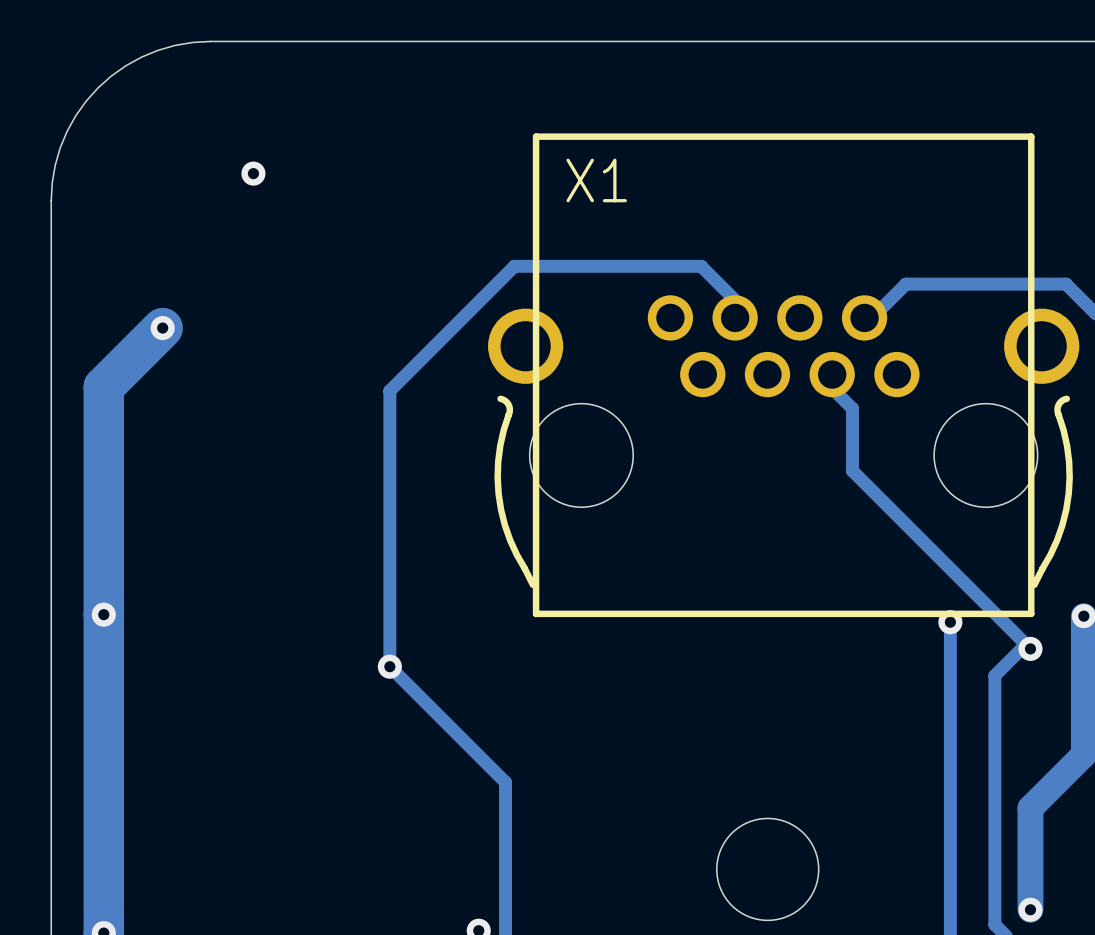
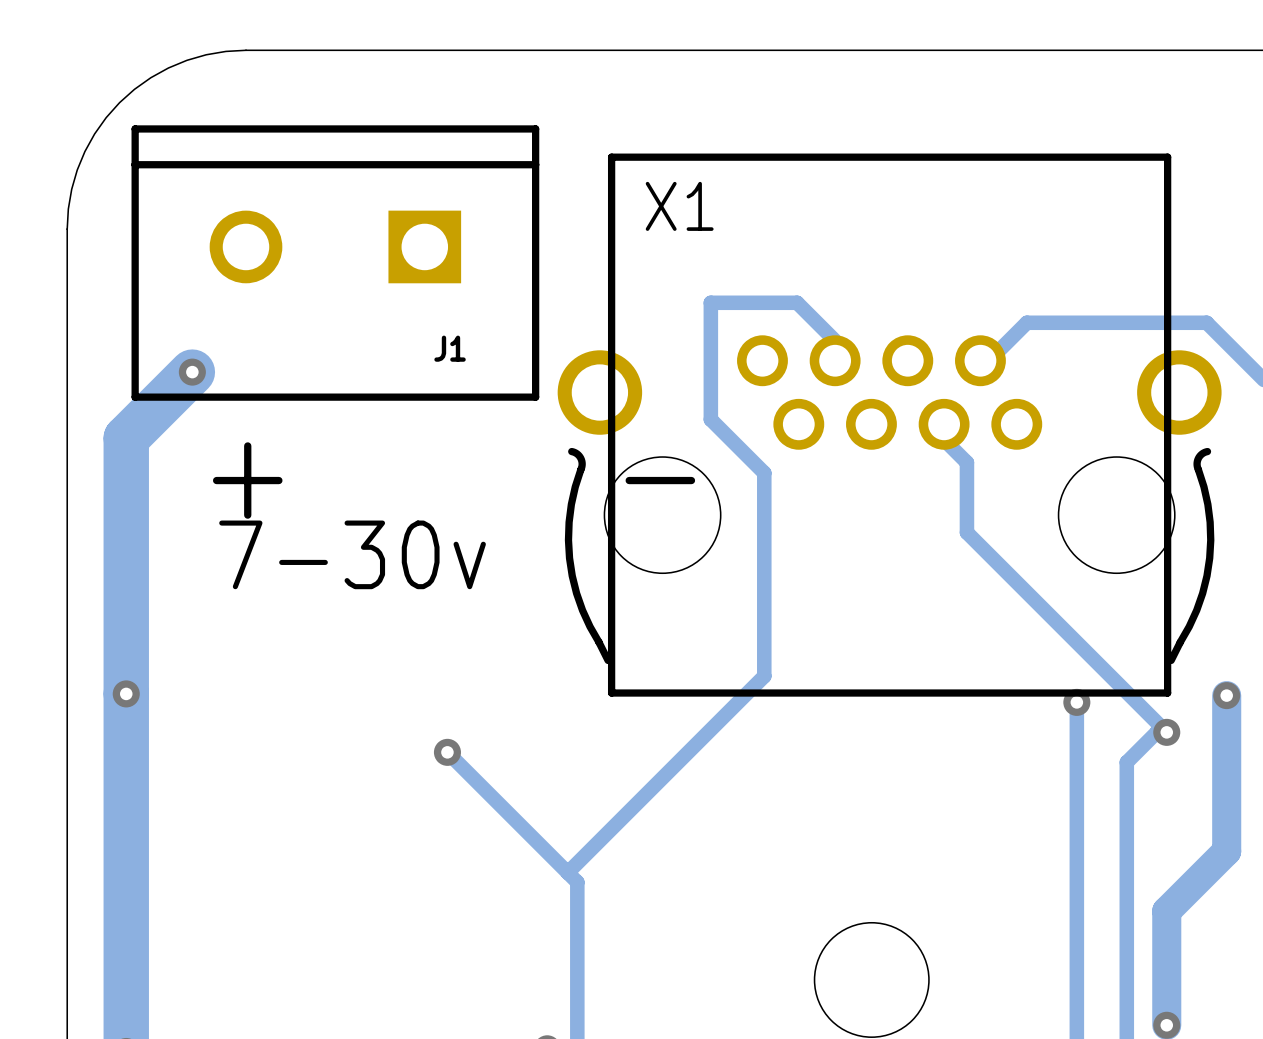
via: (253, 173) -> none
J1: none -> (335, 263)
track: (624, 266) (514, 266) (389, 390) (389, 666) -> (710, 302) (710, 419) (764, 473) (764, 676) (567, 872)
text: none -> + - (454, 480)
text: none -> 7-30v (352, 554)

